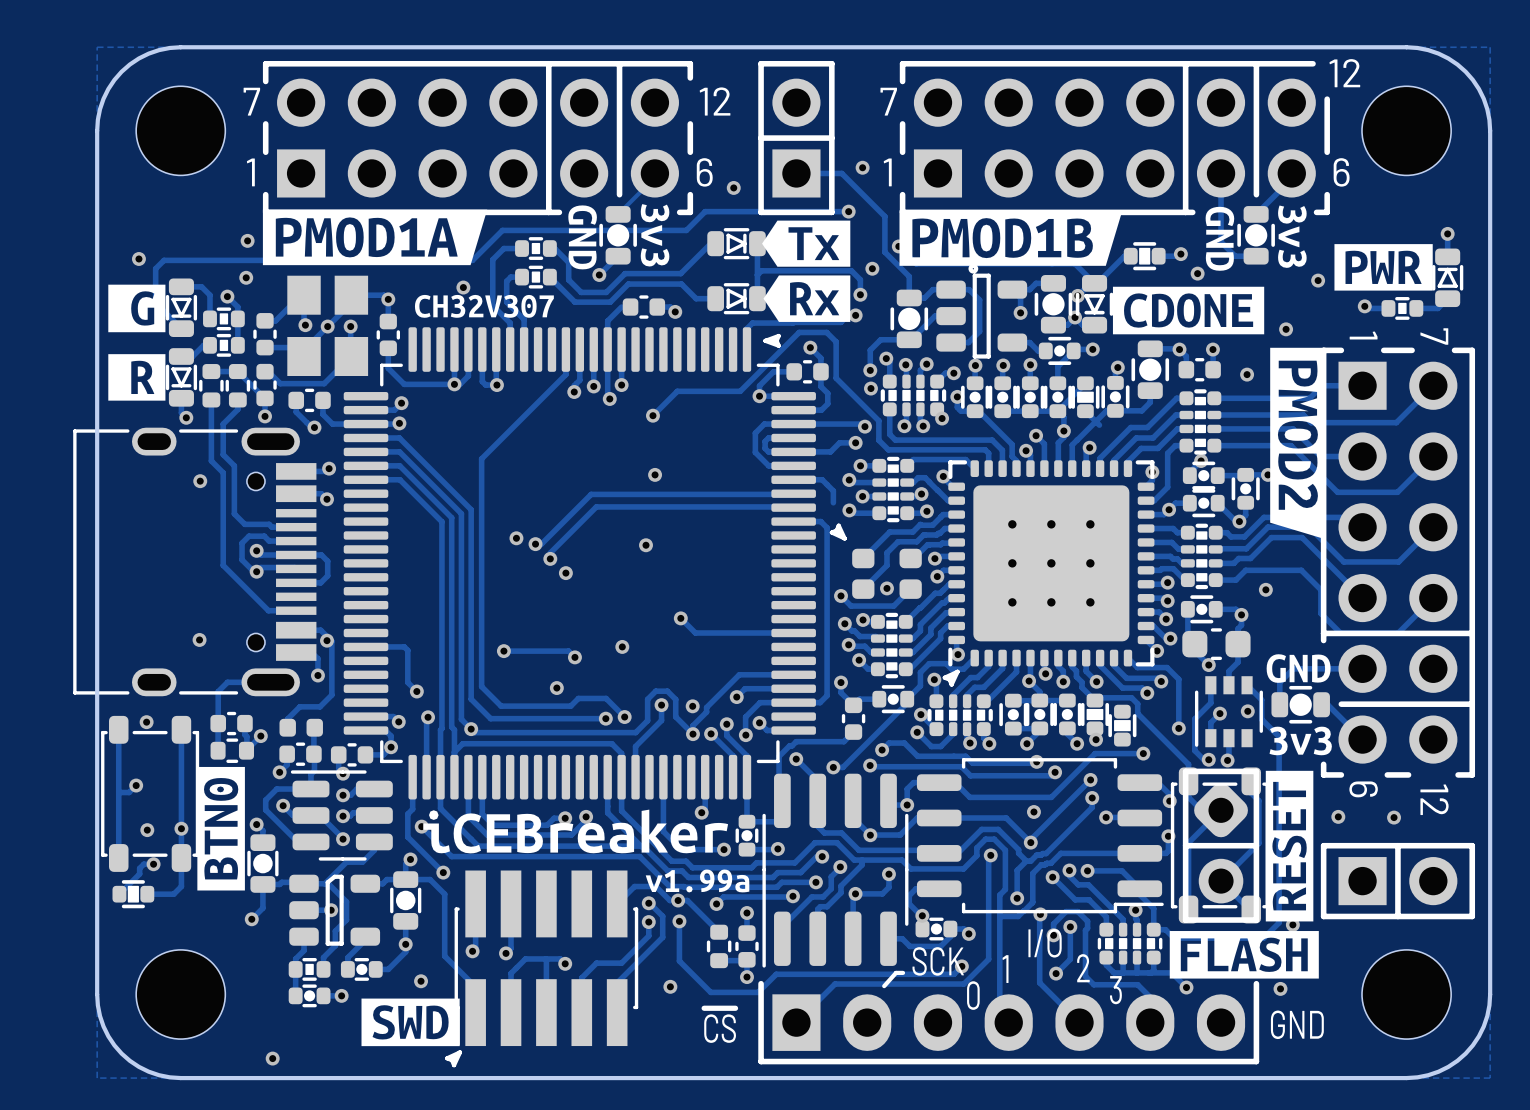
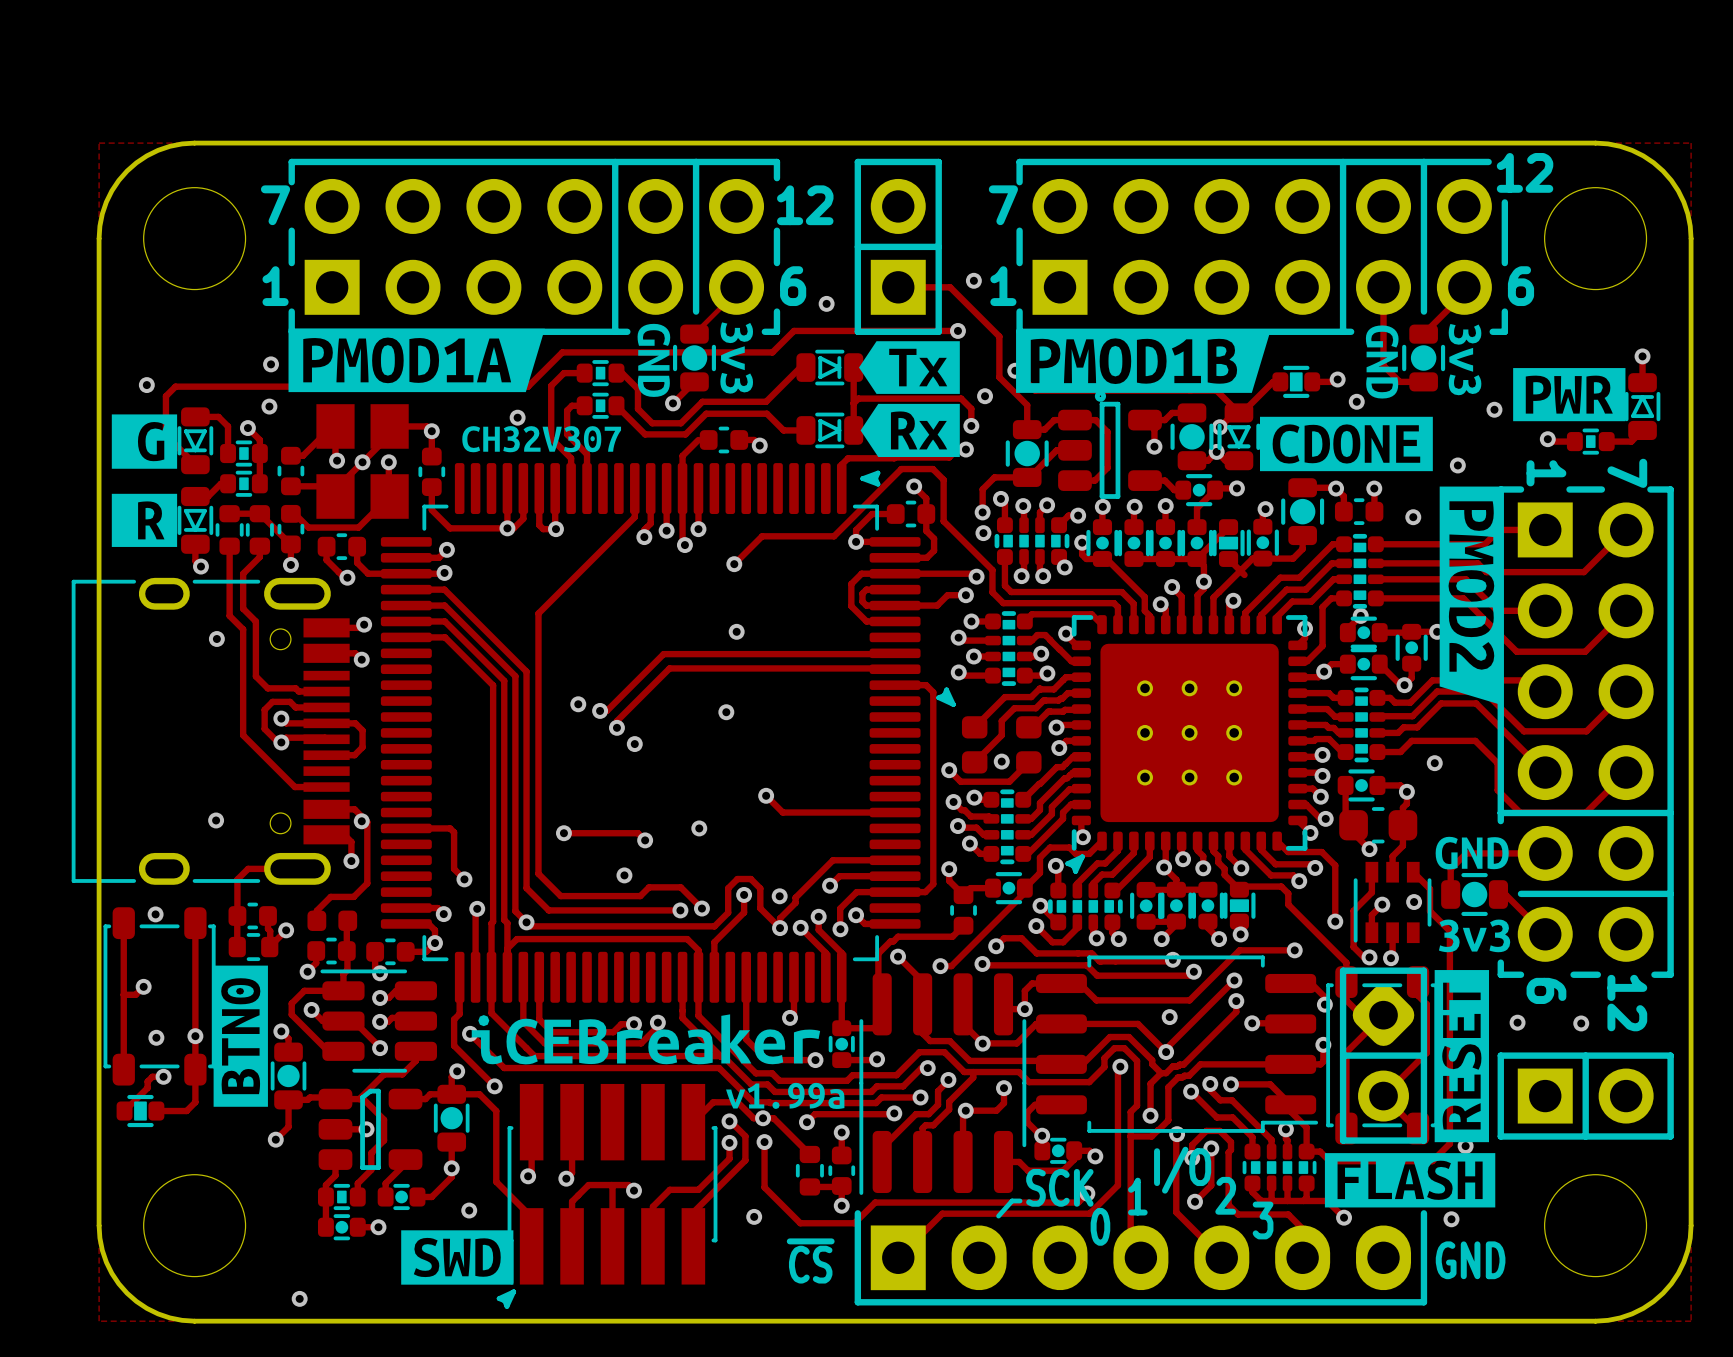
track: (793, 479) (822, 479) (833, 490) (833, 502) -> none
part: (1122, 725) -> none

